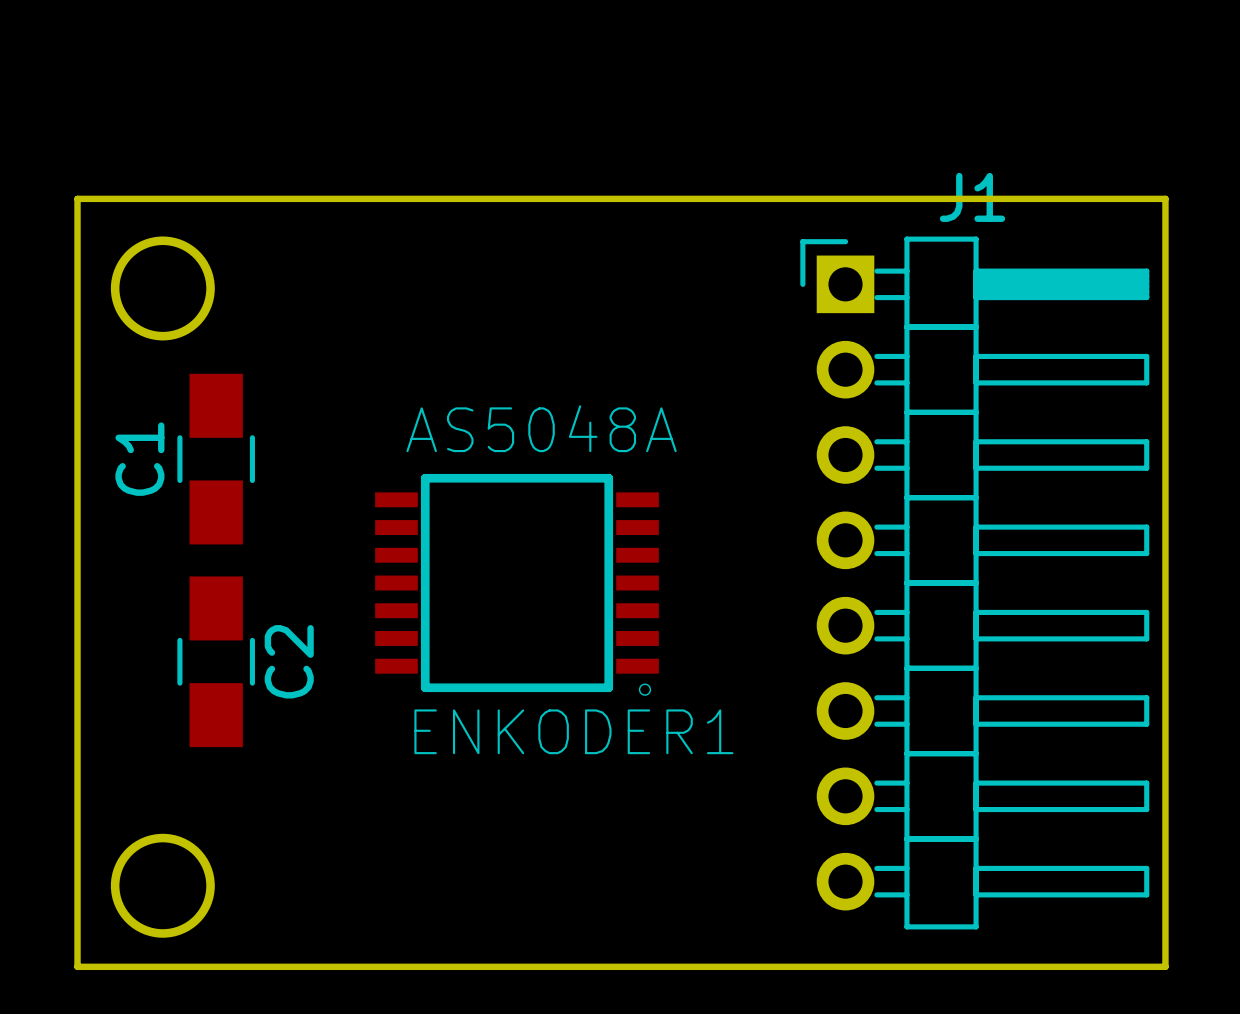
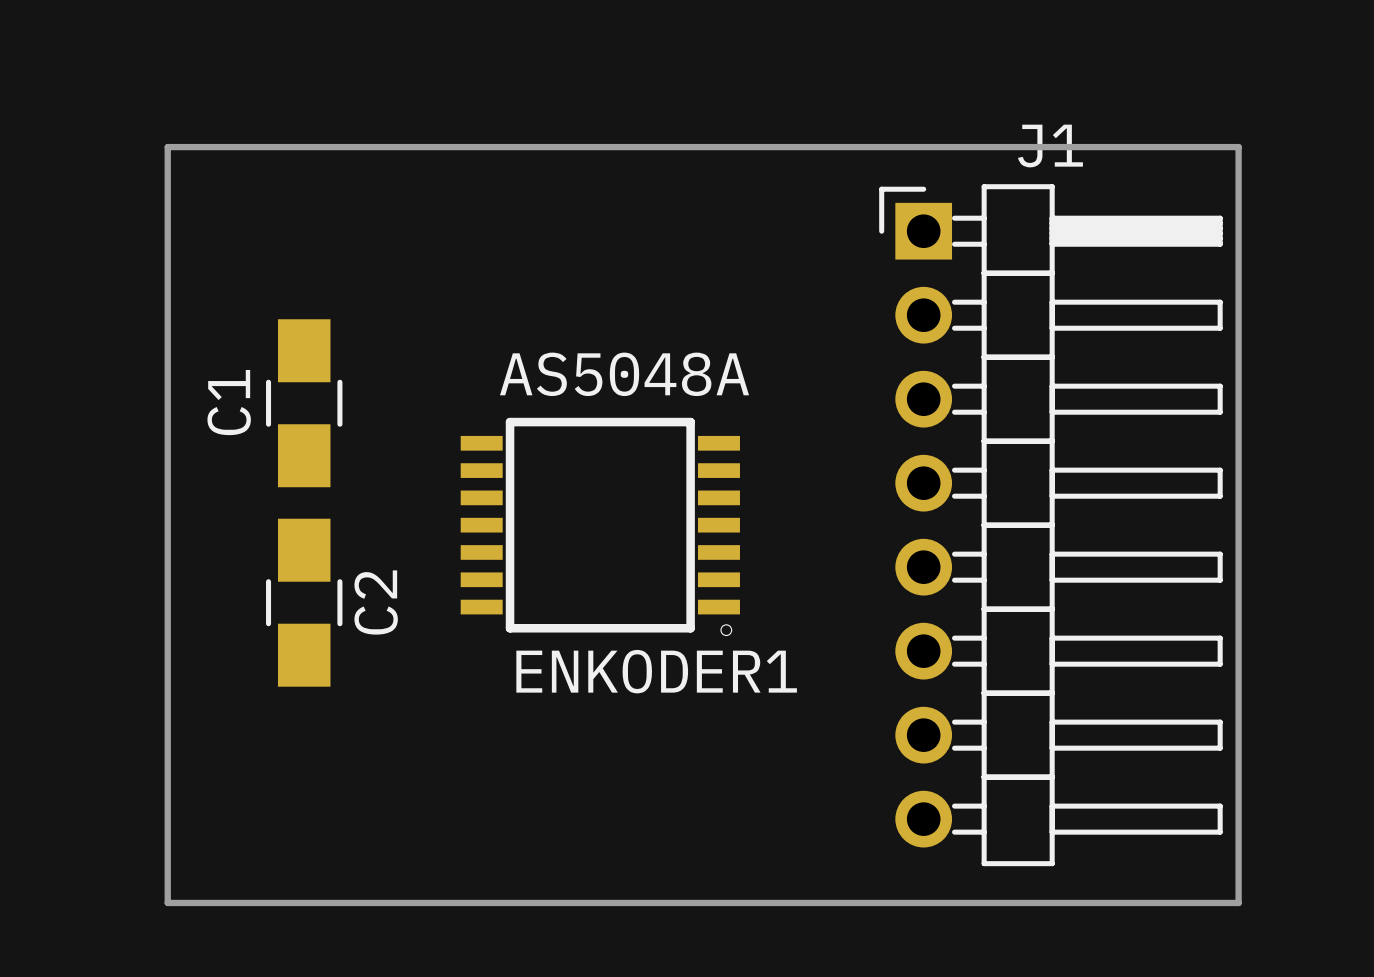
round board edge: [110, 236, 215, 341] -> none
round board edge: [110, 833, 215, 938] -> none

